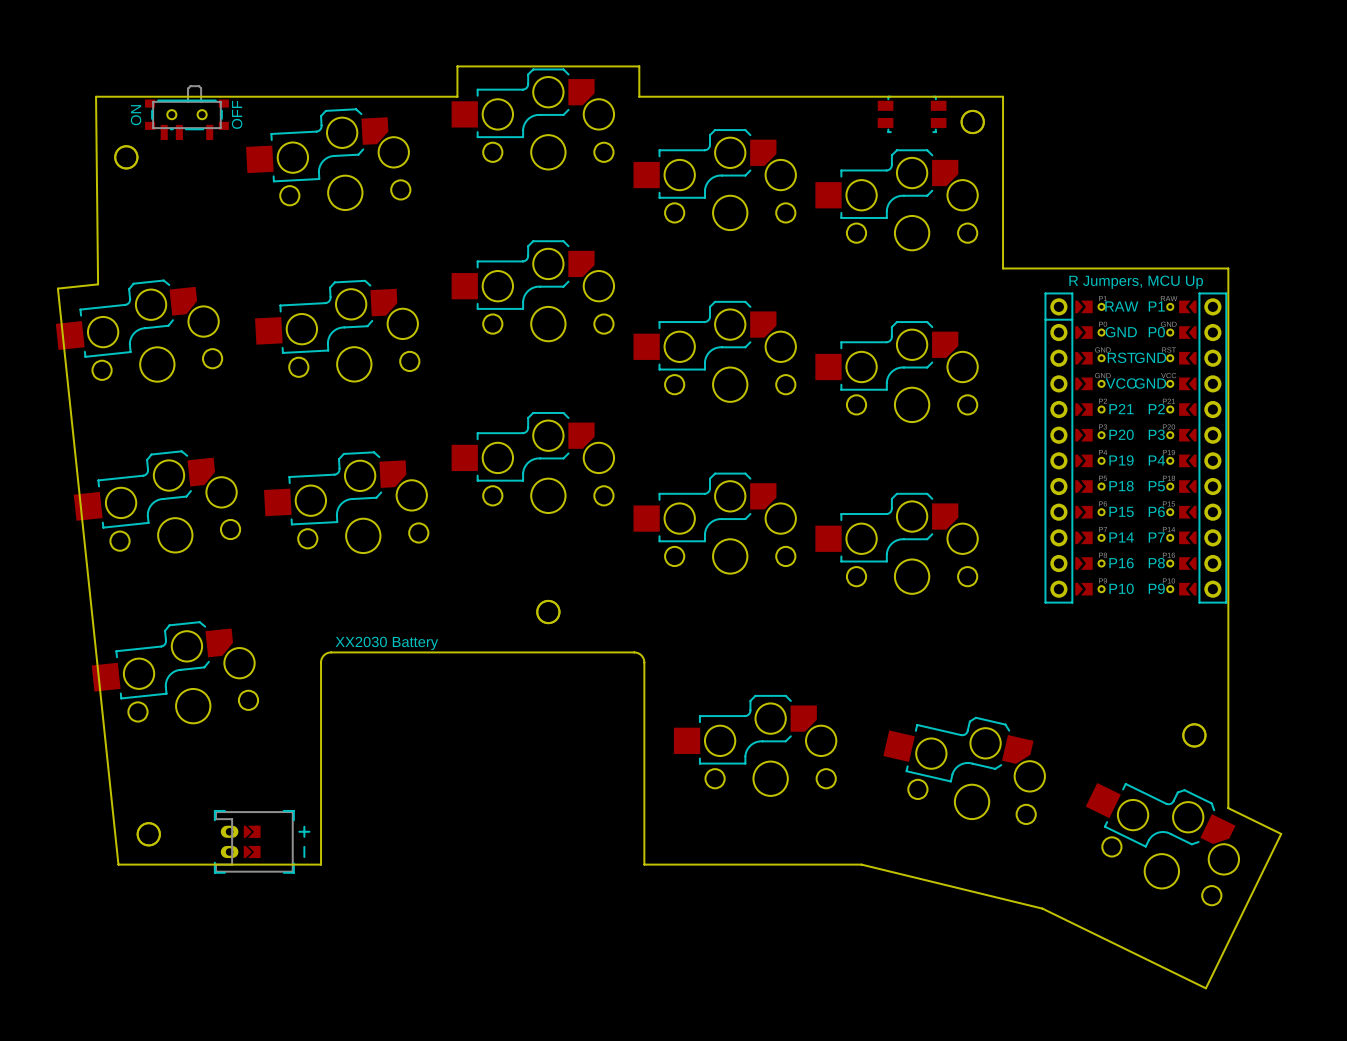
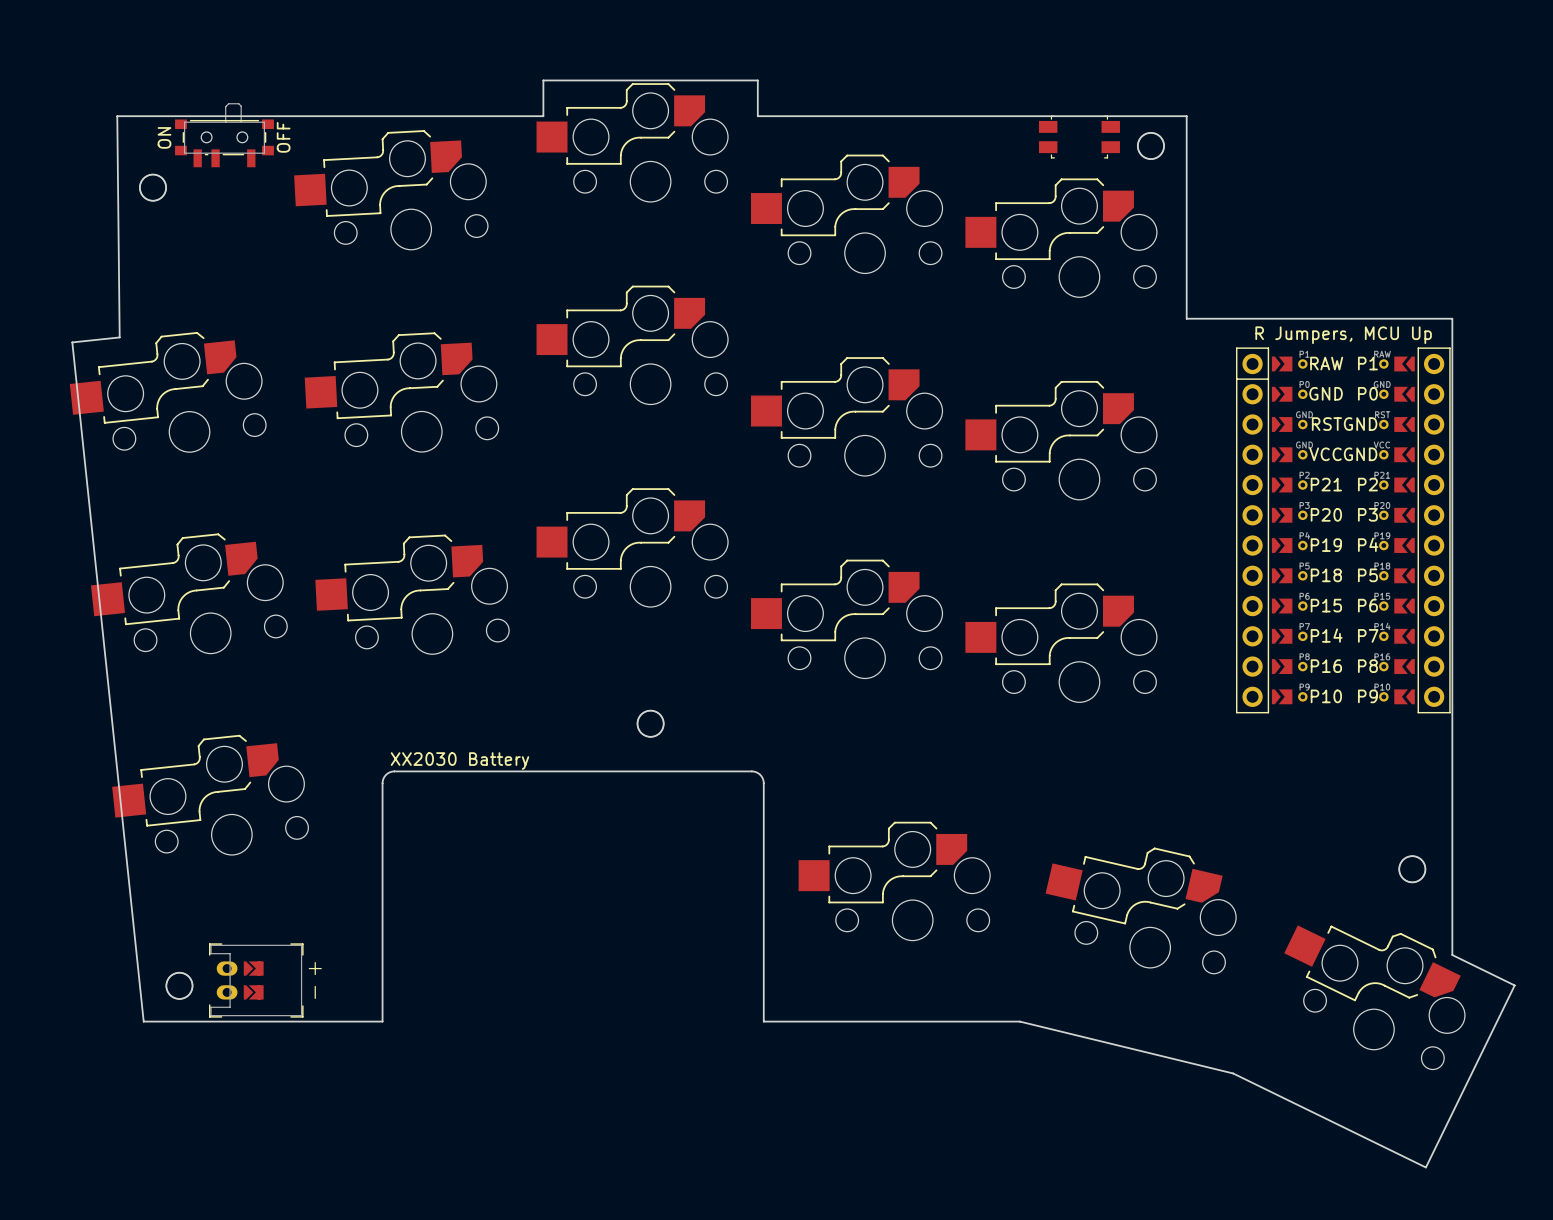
part position: (262, 841) -> (265, 980)

